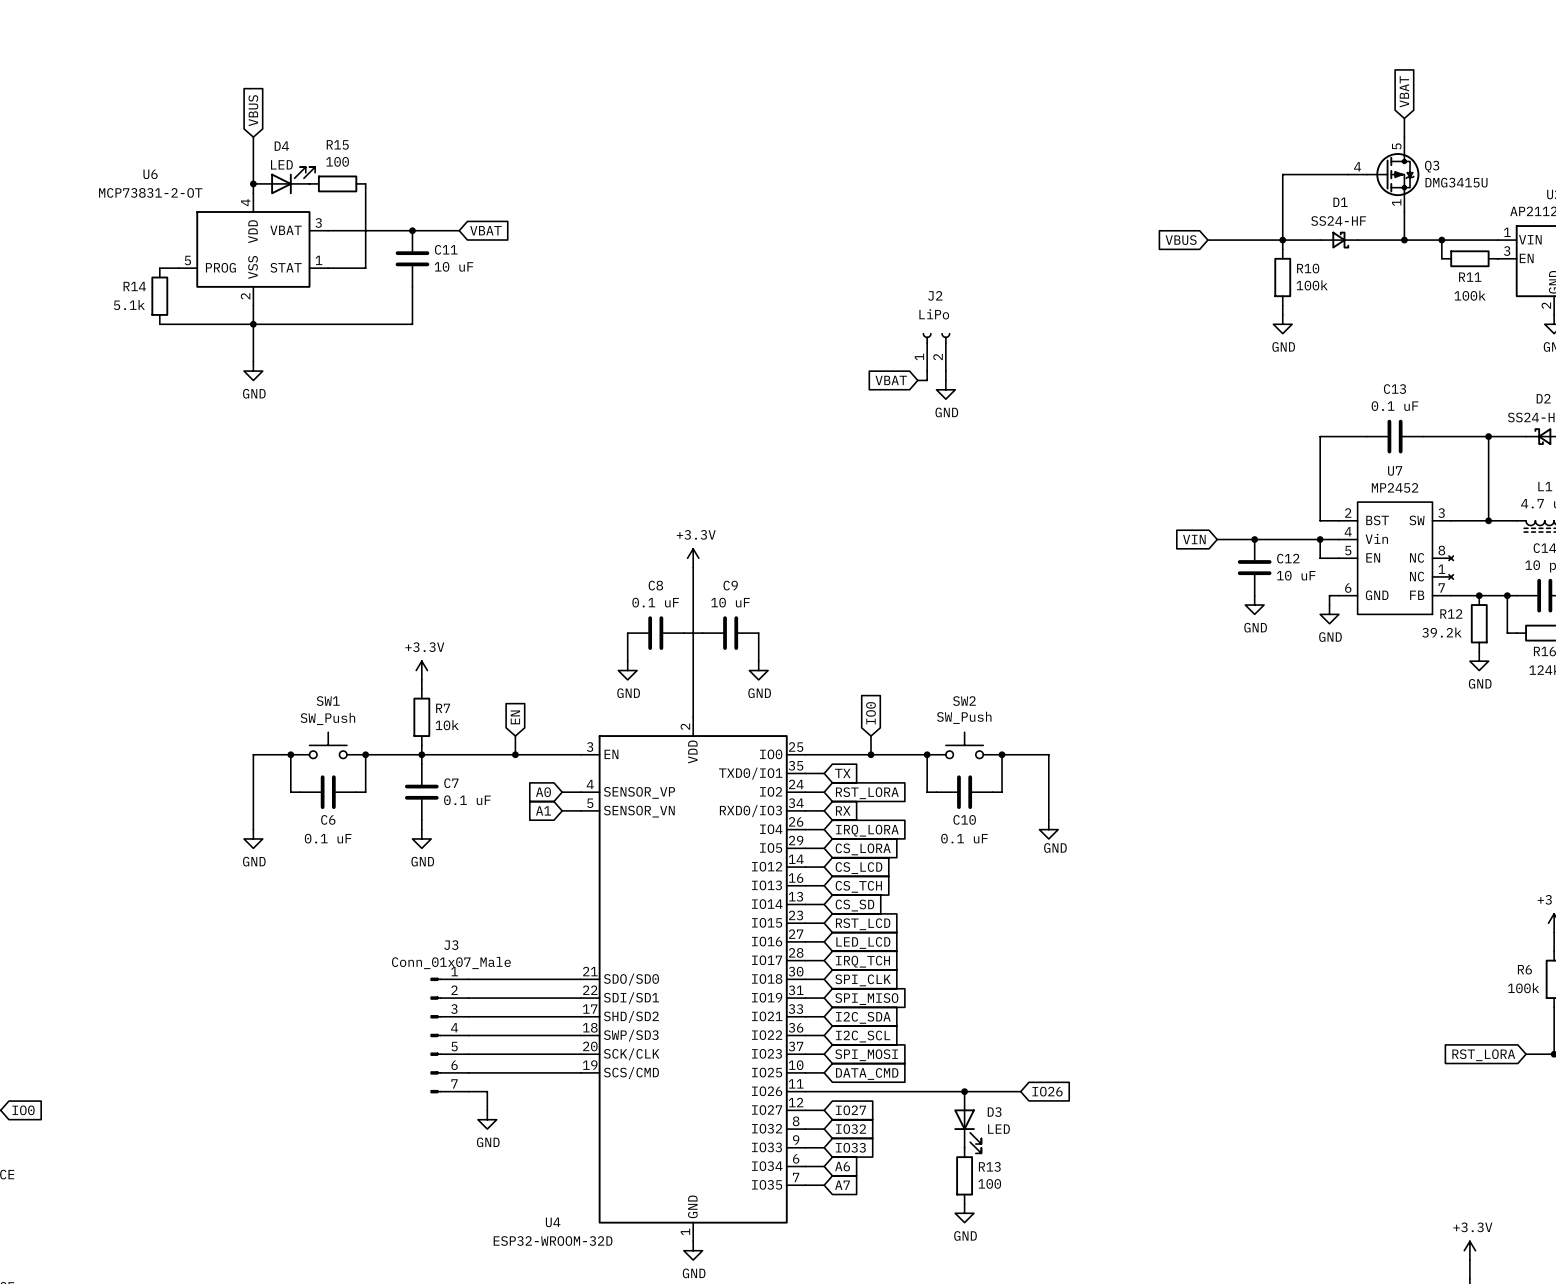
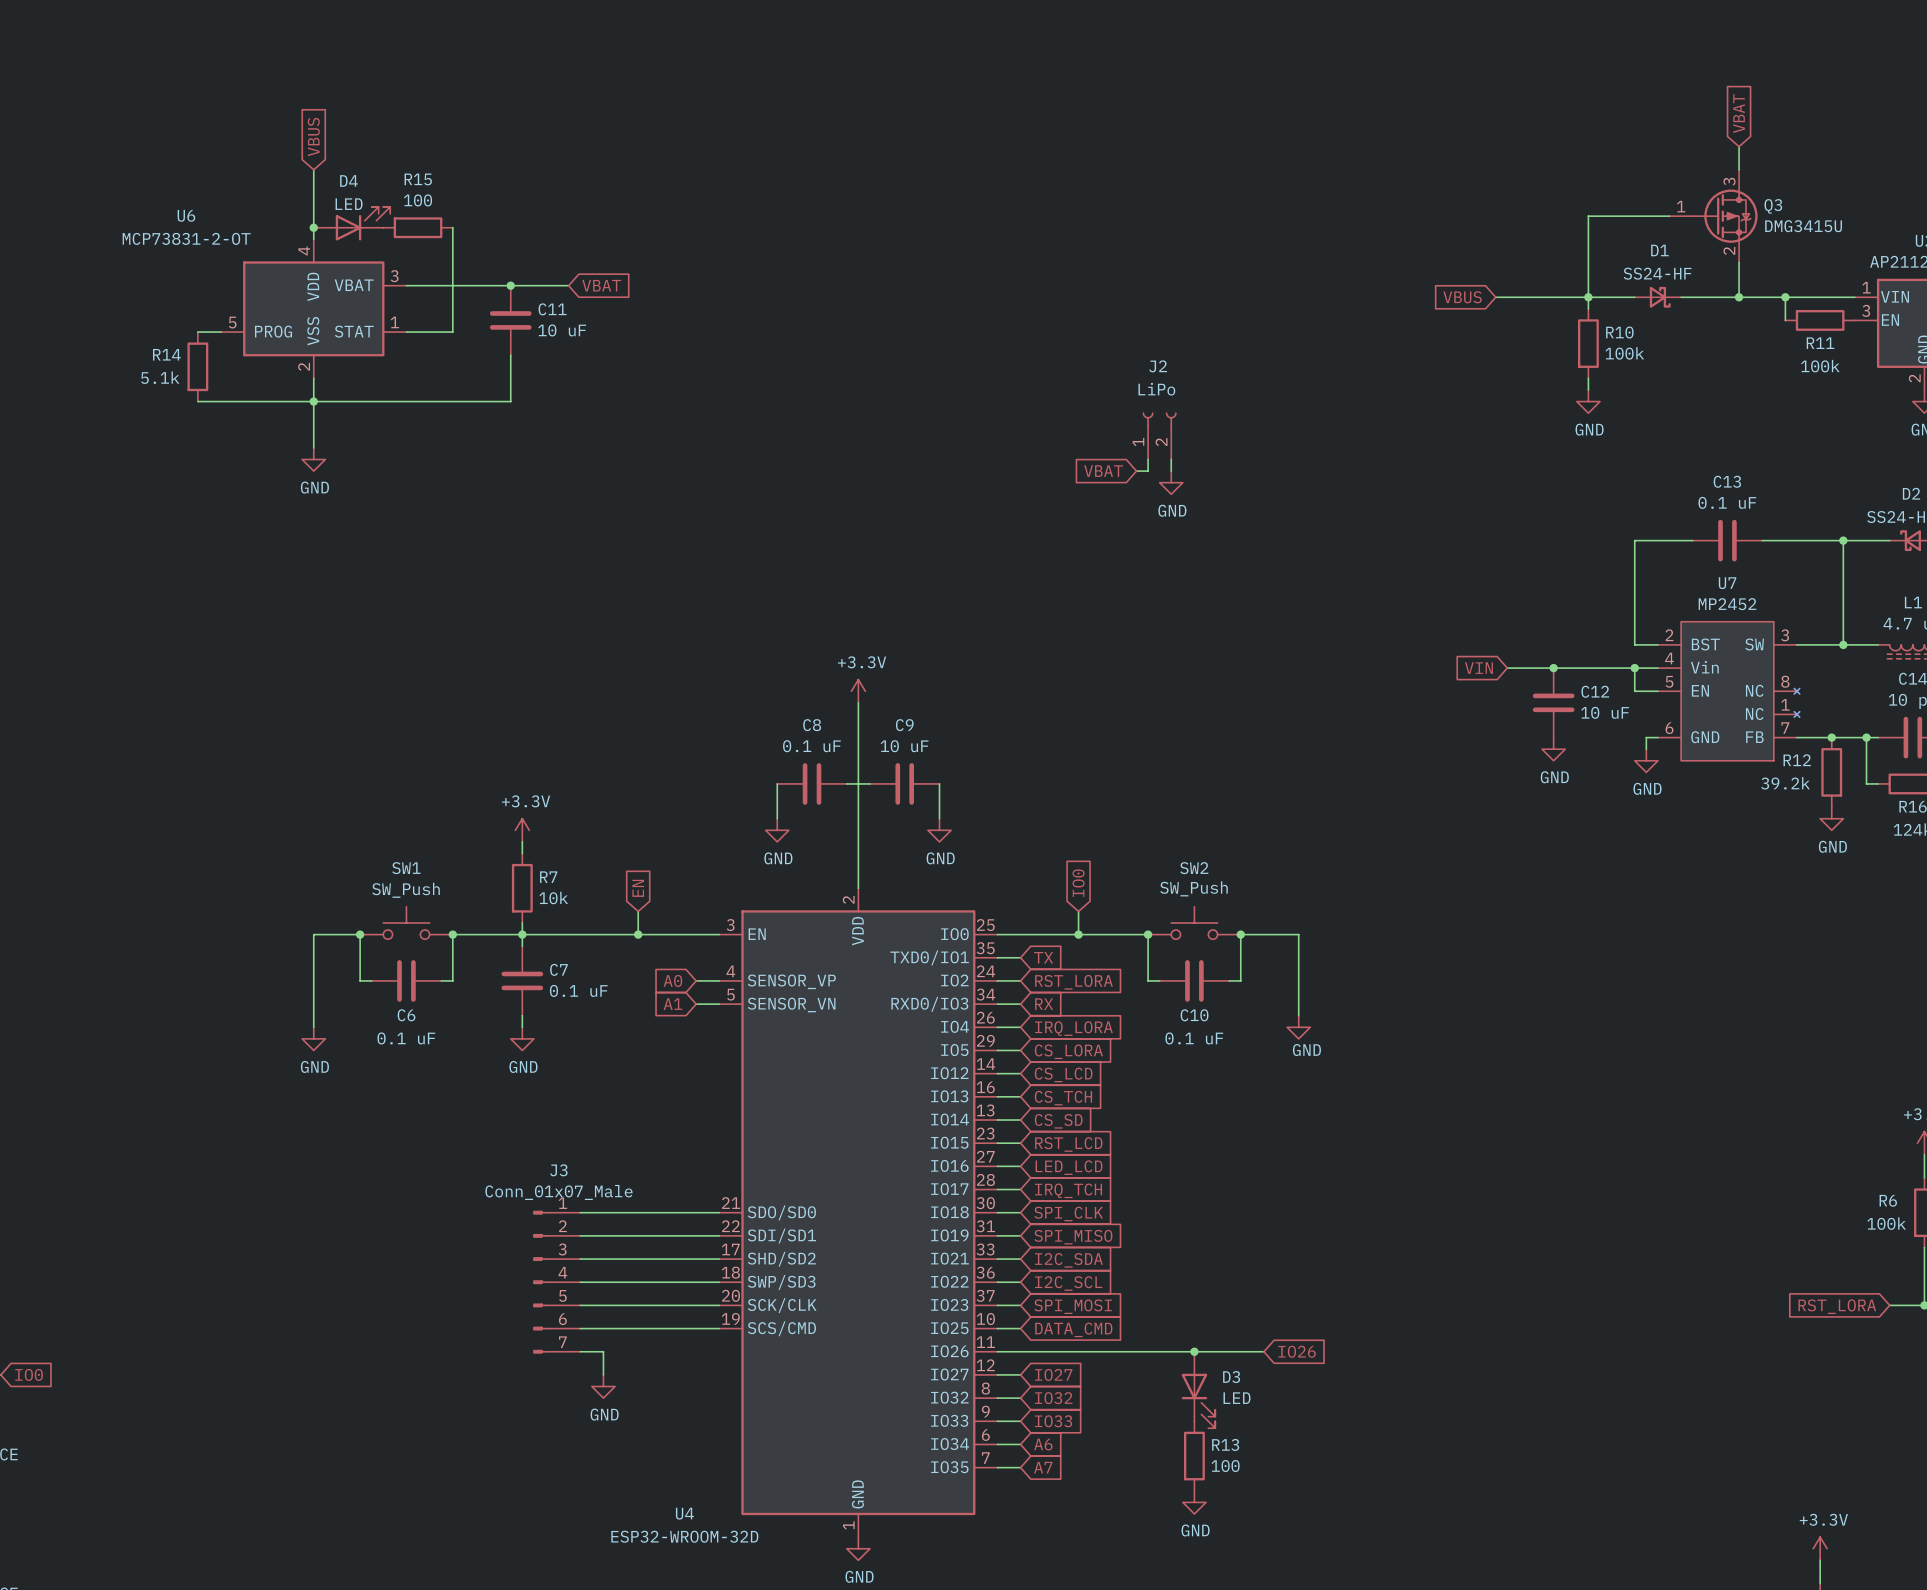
Q3 pin number: 5 (1396, 146) -> 3 (1729, 181)
Q3 pin number: 4 (1357, 166) -> 1 (1681, 206)
Q3 pin number: 1 (1396, 202) -> 2 (1729, 250)

